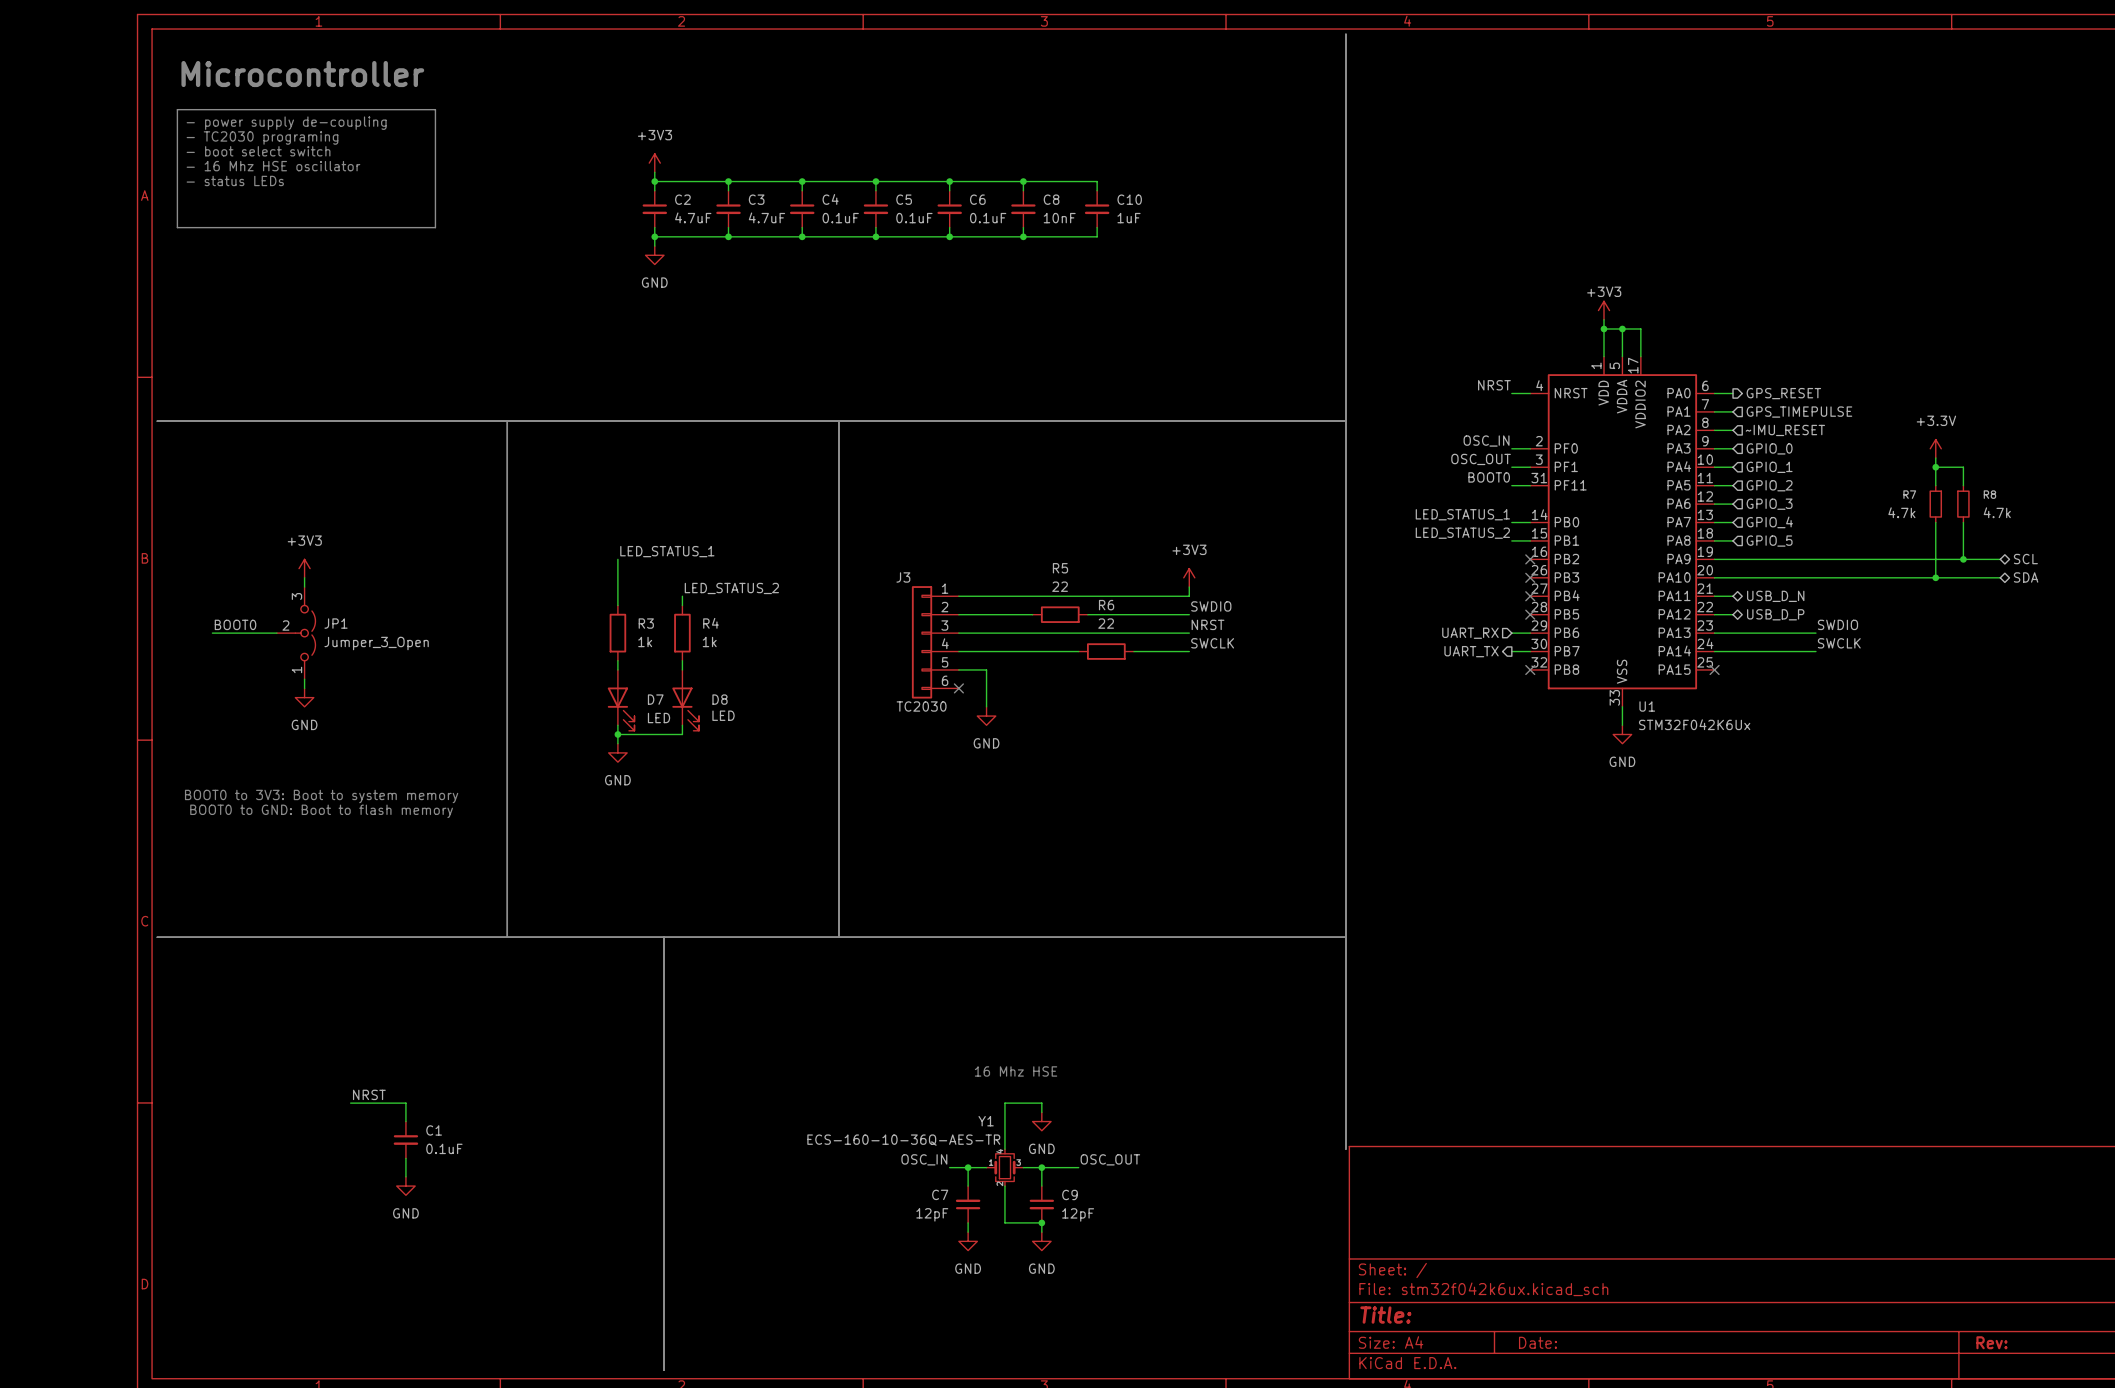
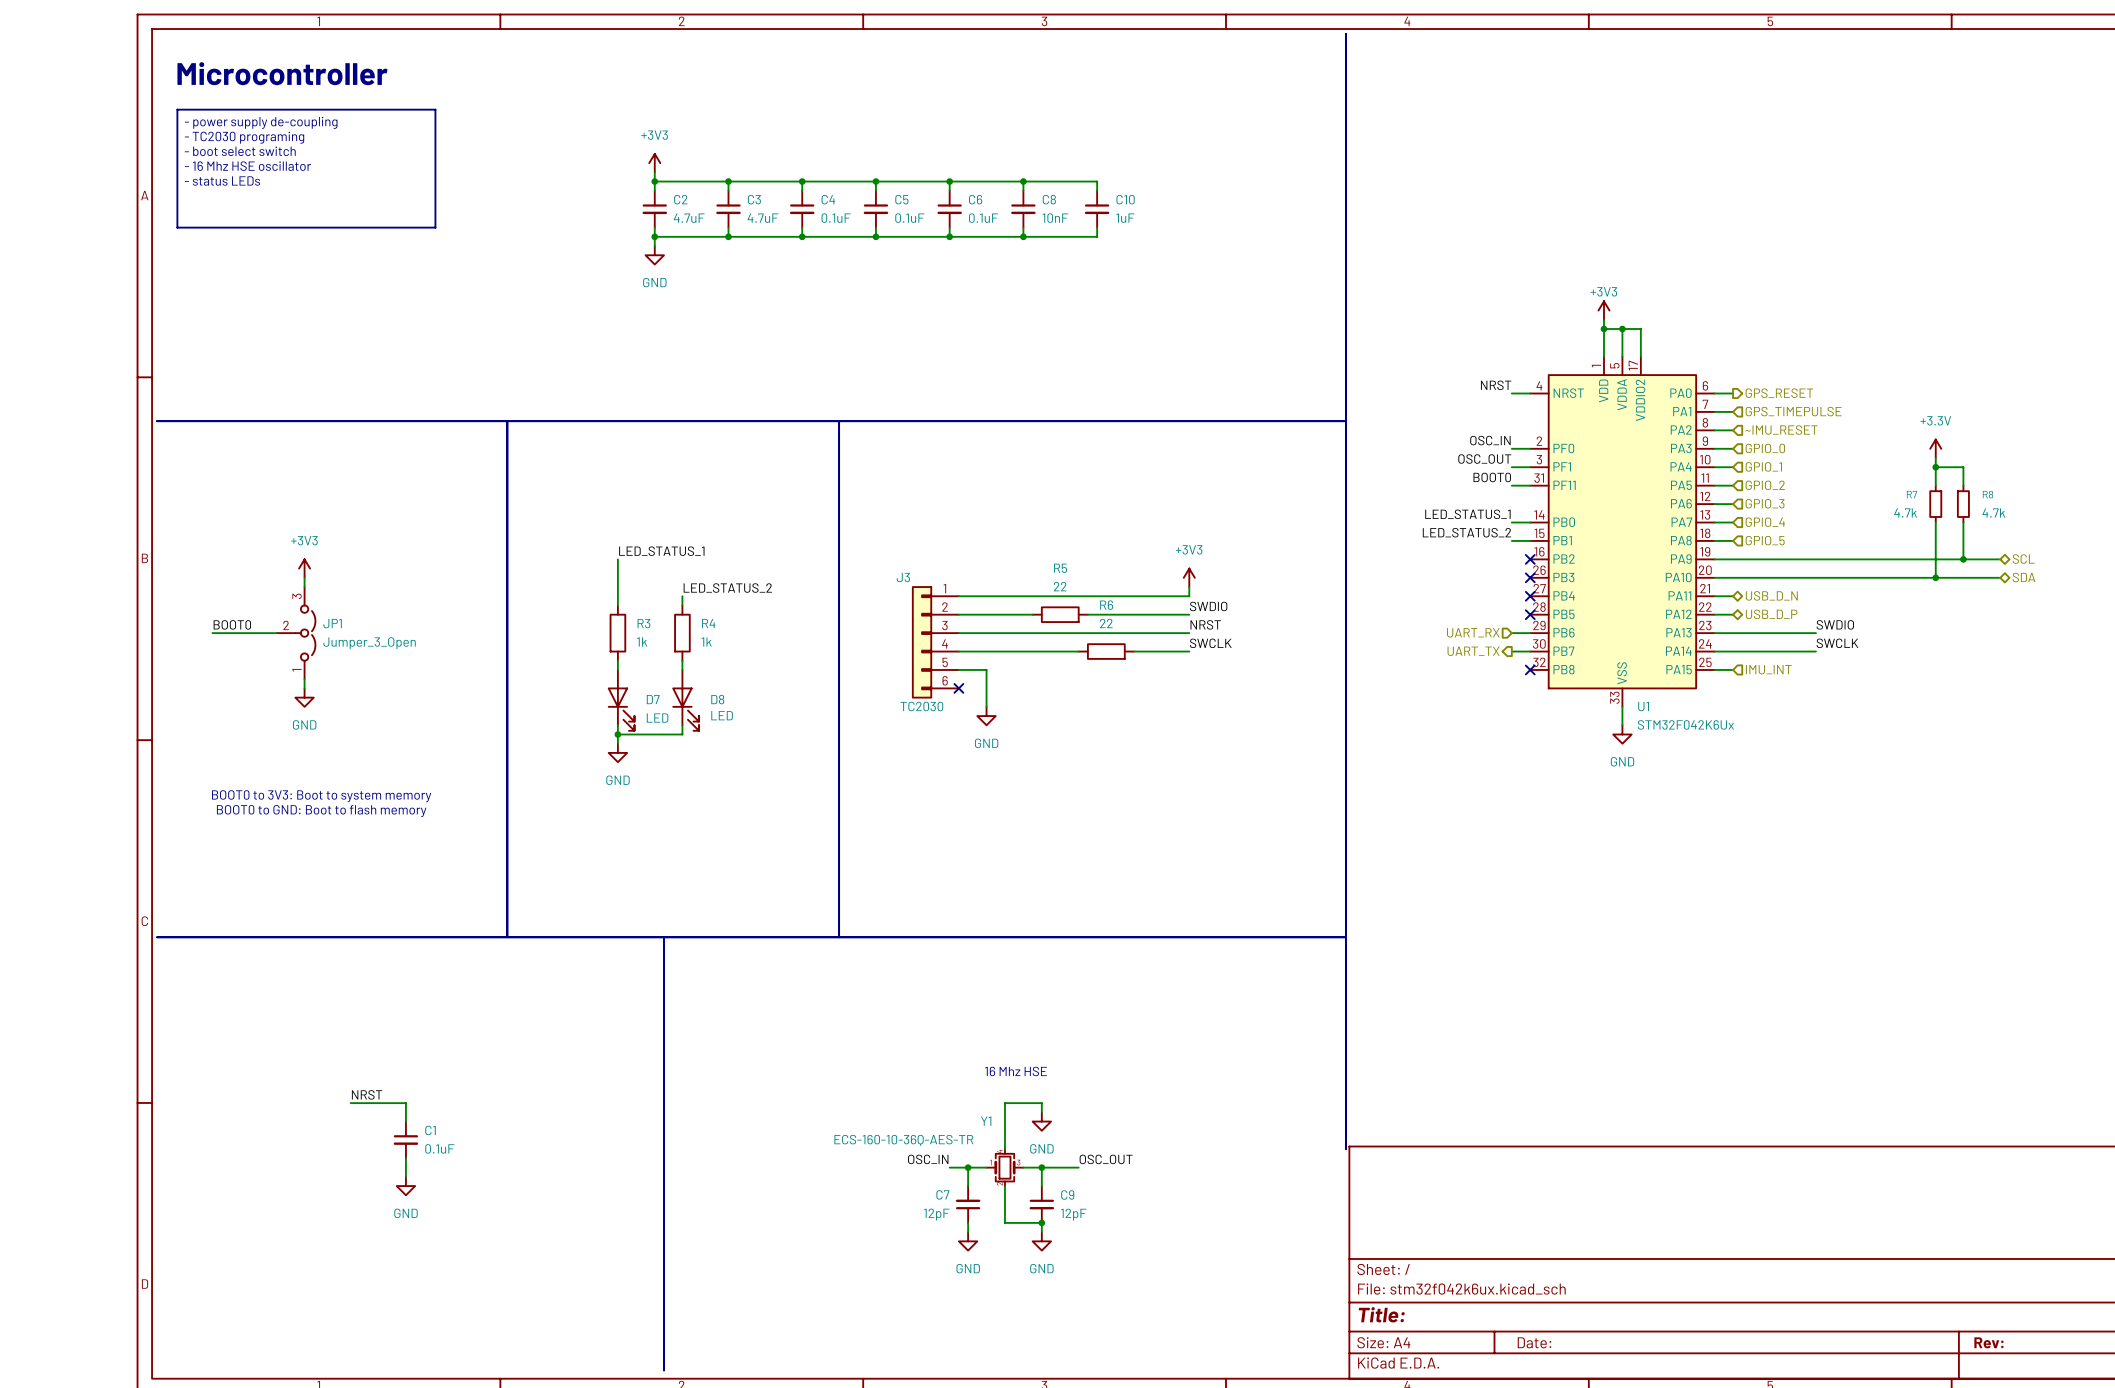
wire: none -> (1714, 669) (1733, 669)
no-connect mark: (1714, 669) -> none
hierarchical label: none -> IMU_INT (1768, 669)

